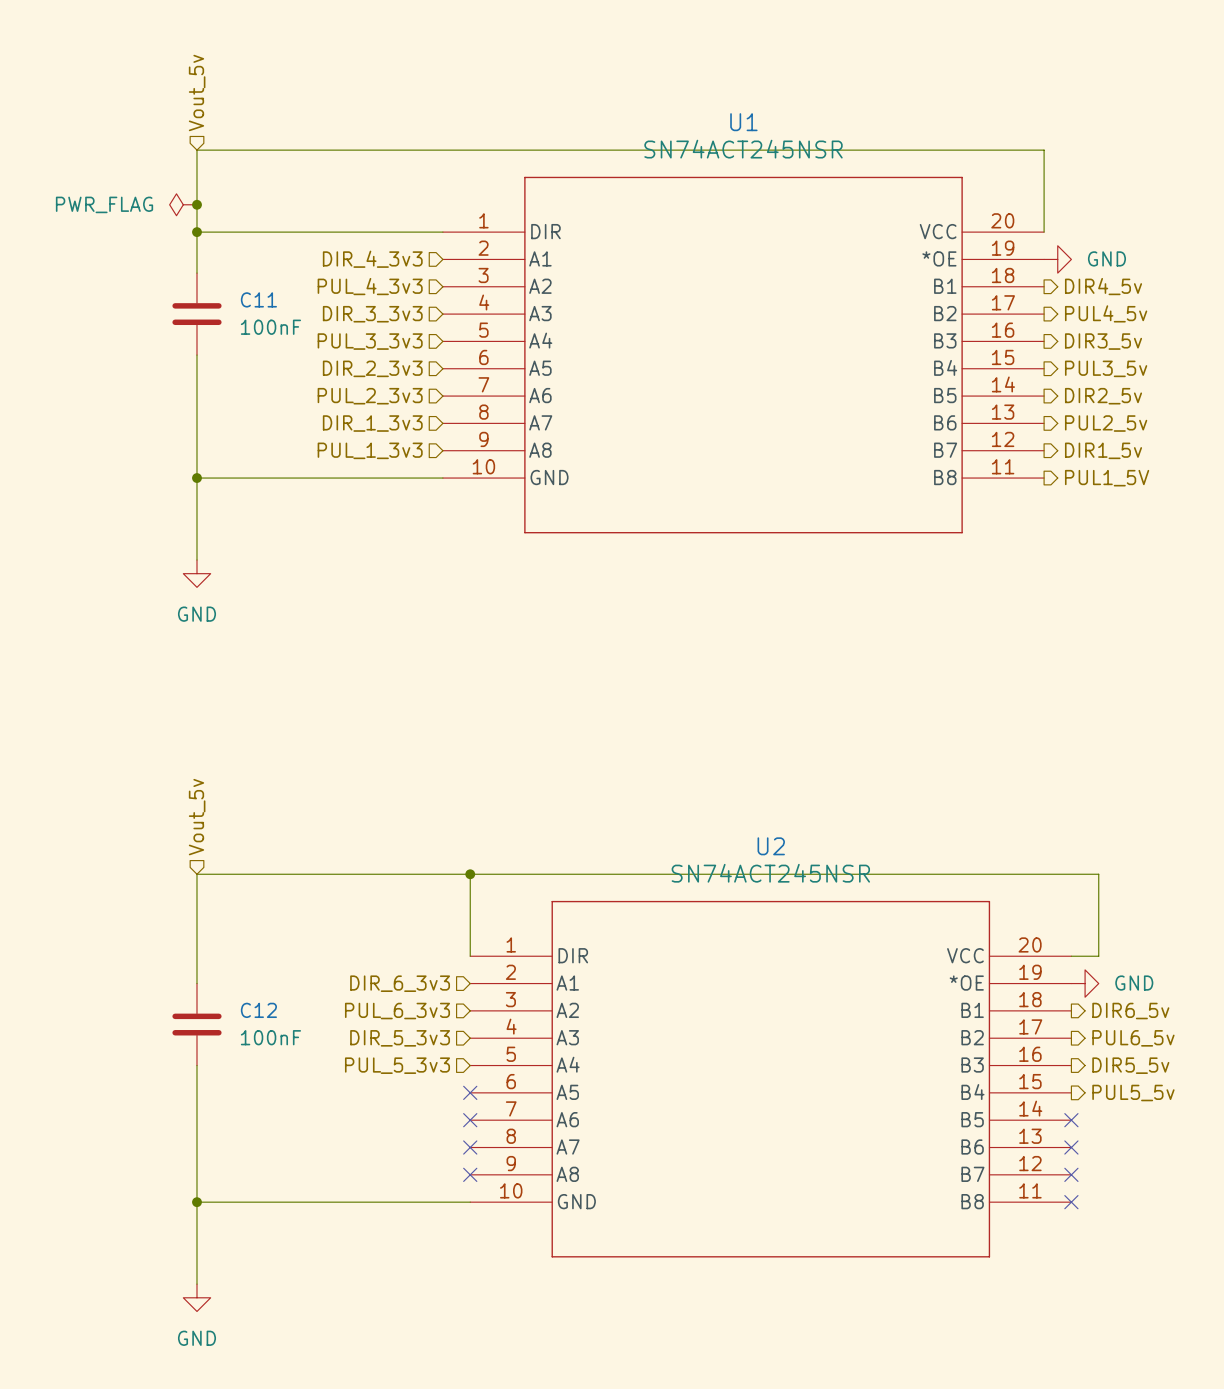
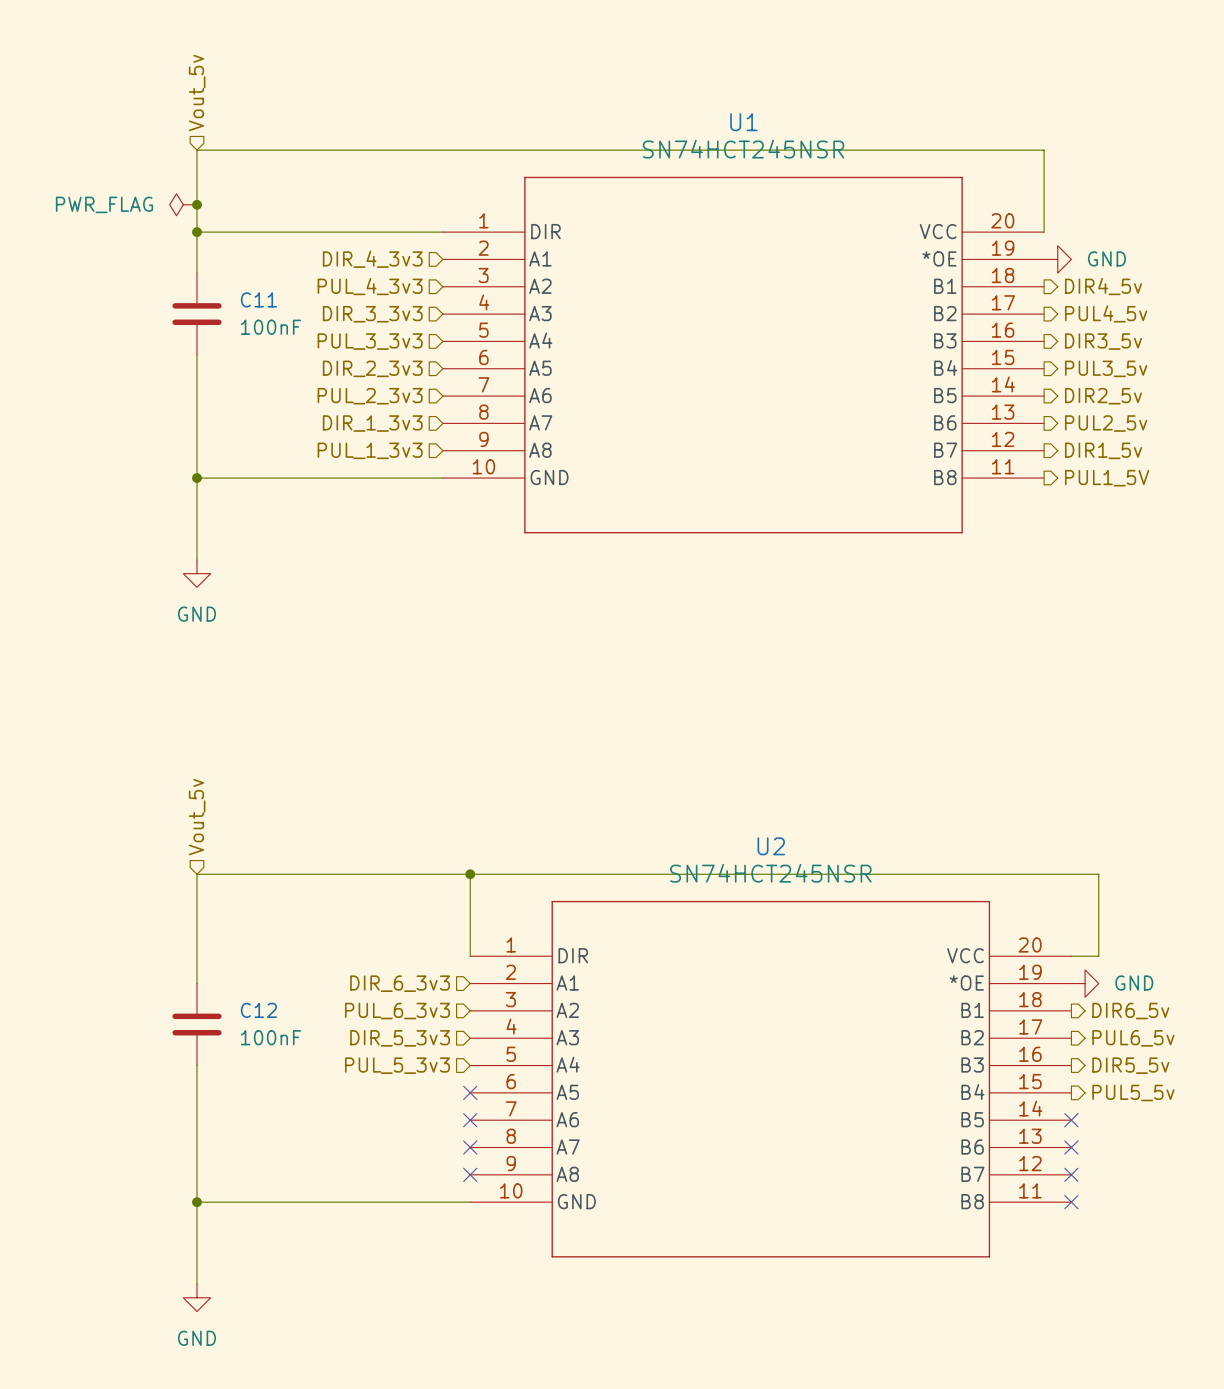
U1 value: SN74ACT245NSR (743, 149) -> SN74HCT245NSR (743, 149)
U2 value: SN74ACT245NSR (770, 873) -> SN74HCT245NSR (770, 873)

